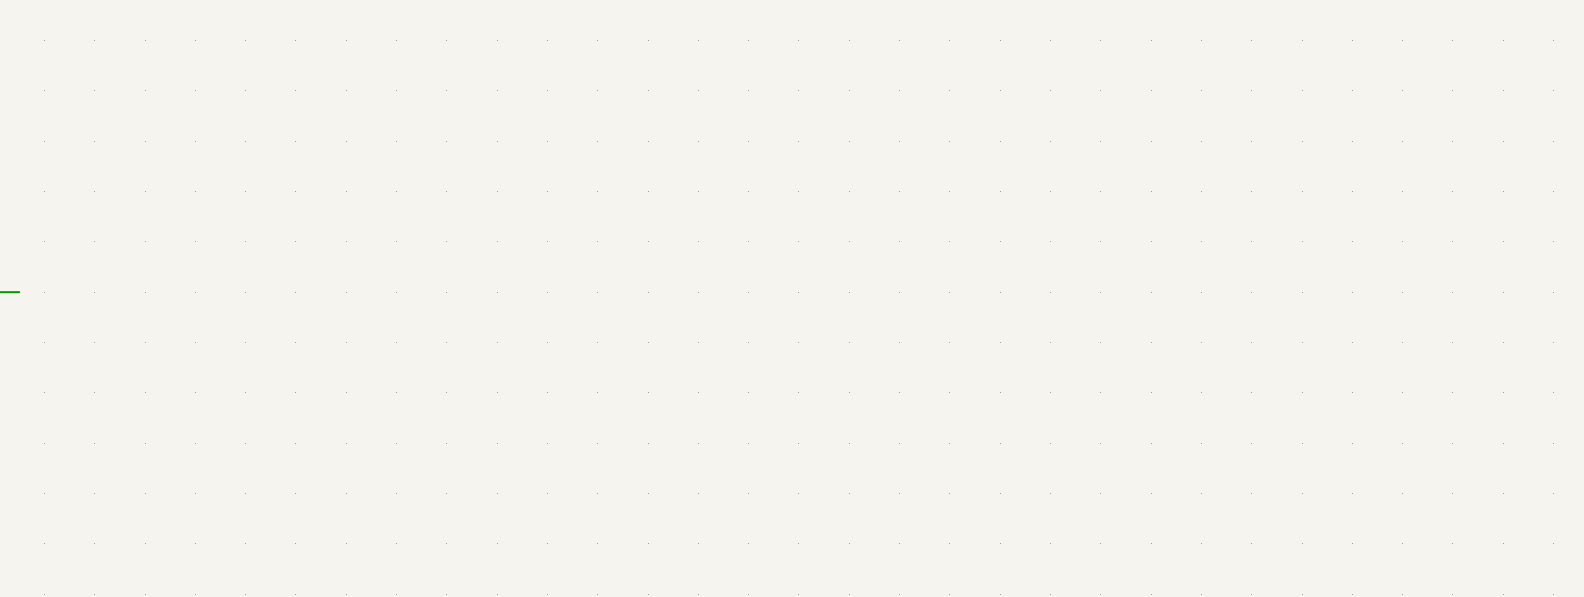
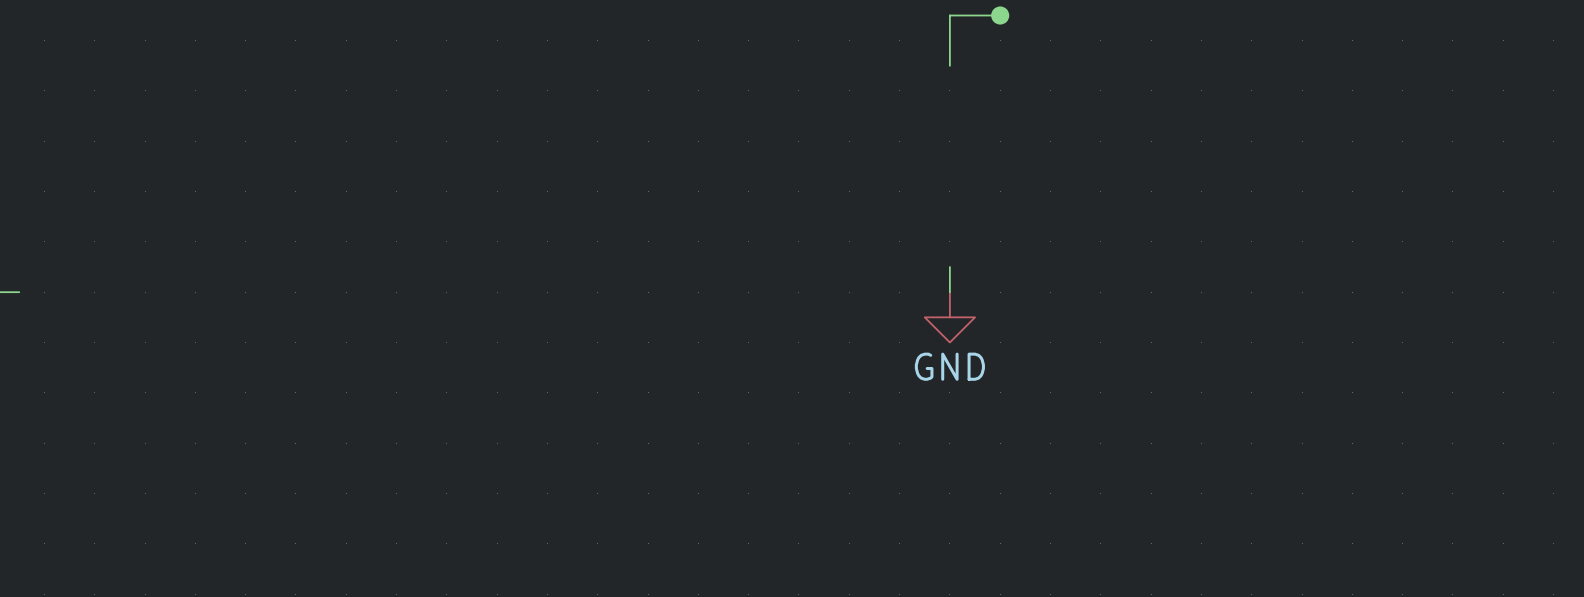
wire: none -> (1000, 15) (949, 15) (949, 65)
junction: none -> (1000, 15)
wire: none -> (949, 267) (949, 292)
power symbol: none -> GND (949, 317)

